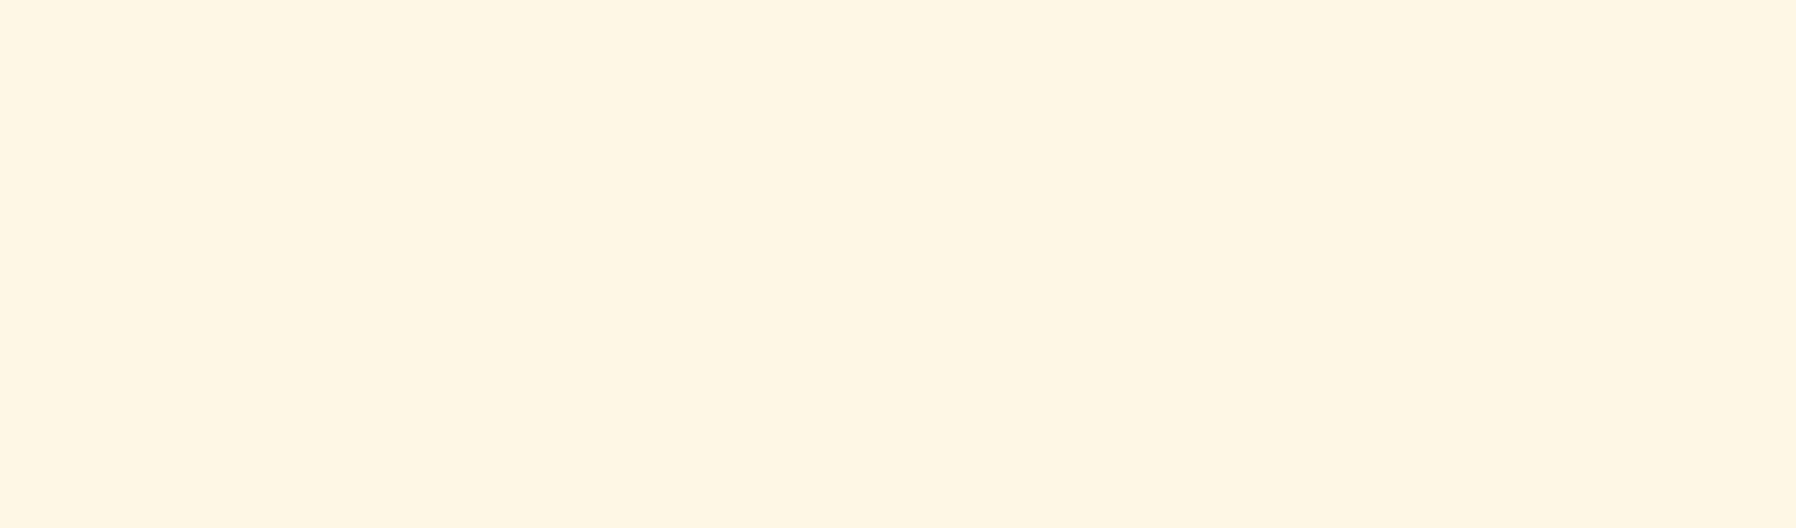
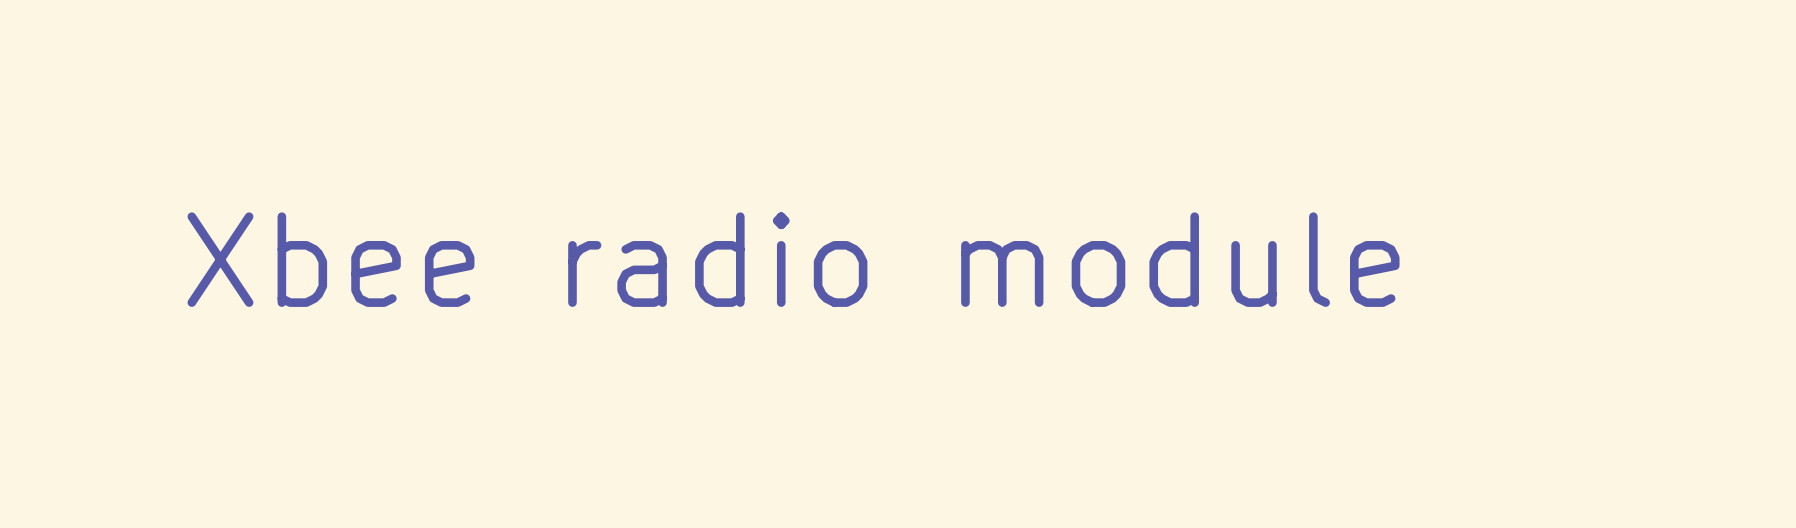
text: none -> Xbee radio module (793, 259)

